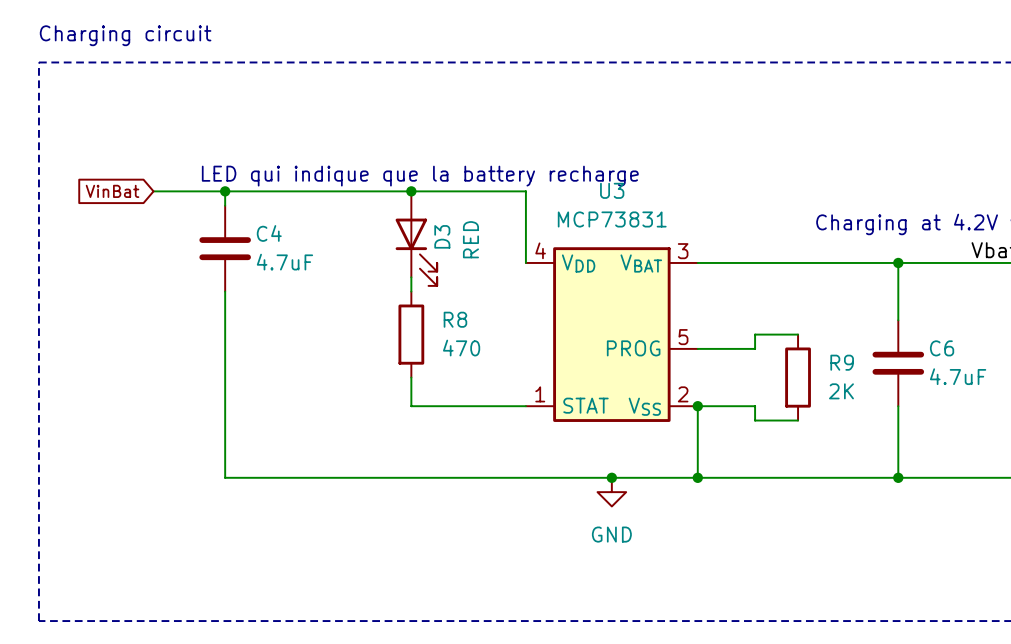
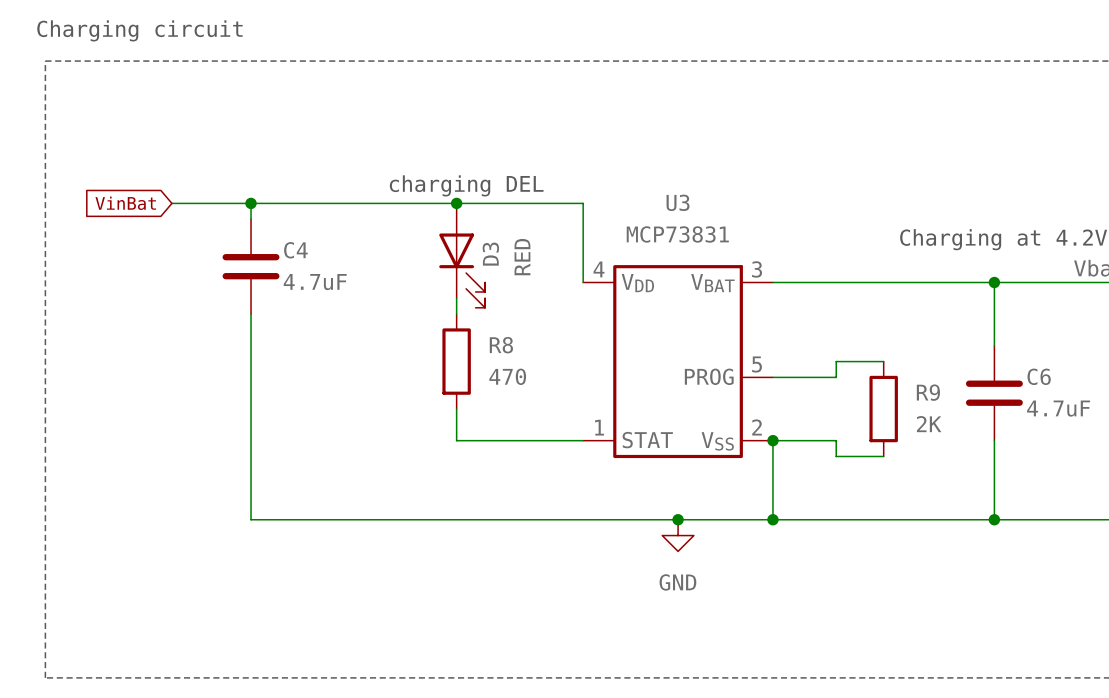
text: LED qui indique que la battery recharge (420, 176) -> charging DEL (466, 185)

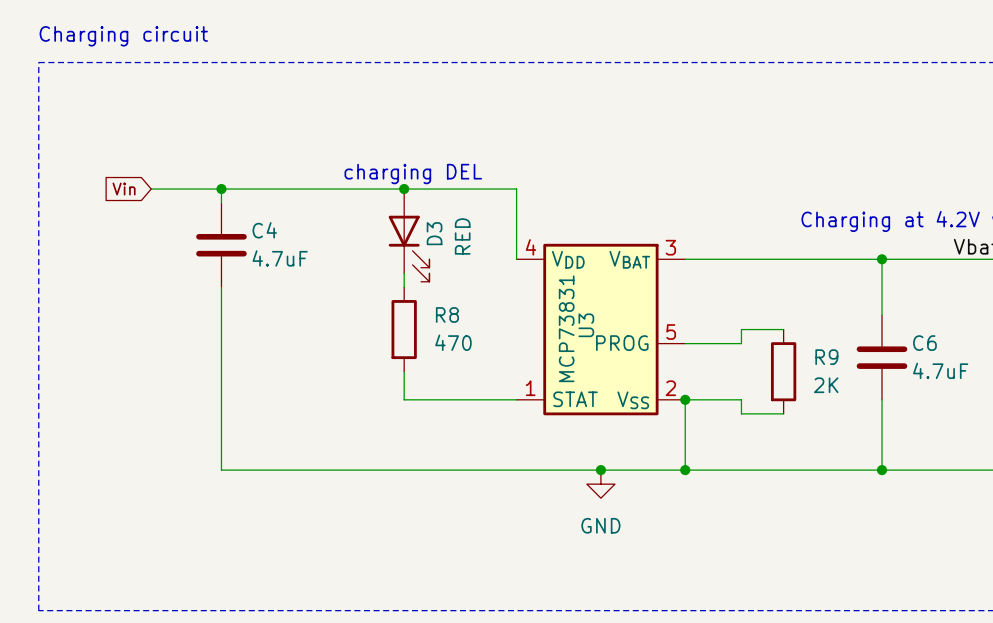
U3 name rotation: 0° (678, 202) -> 90° counterclockwise (586, 325)
U3 name position: U3 (678, 202) -> U3 (586, 325)
global label: VinBat (125, 203) -> Vin (124, 189)
U3 value rotation: 0° (677, 234) -> 90° counterclockwise (566, 328)

